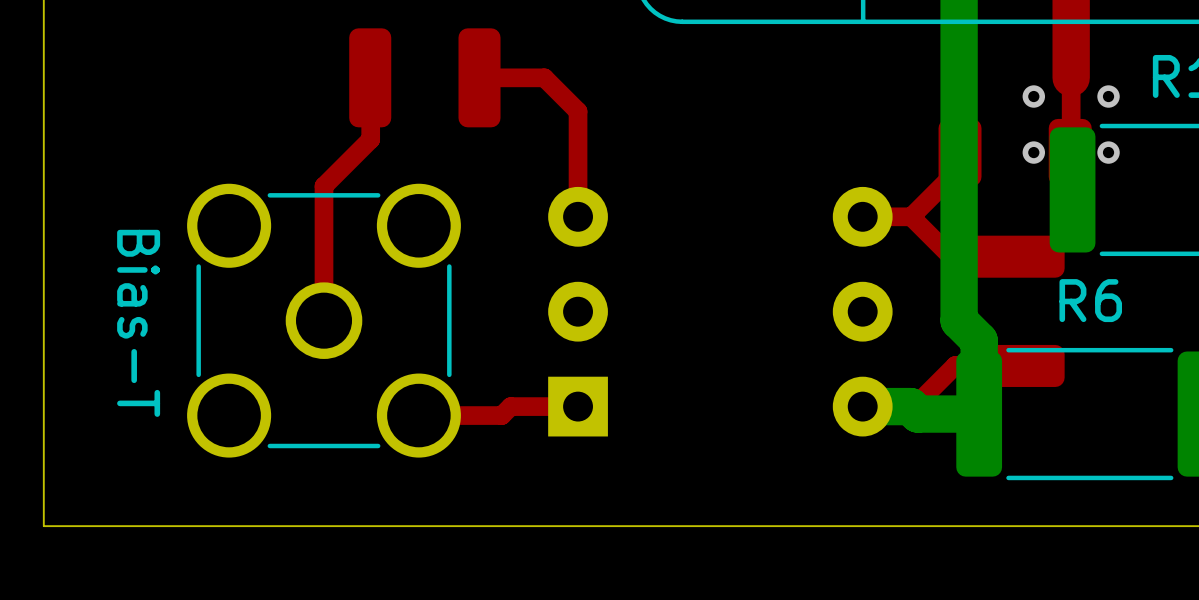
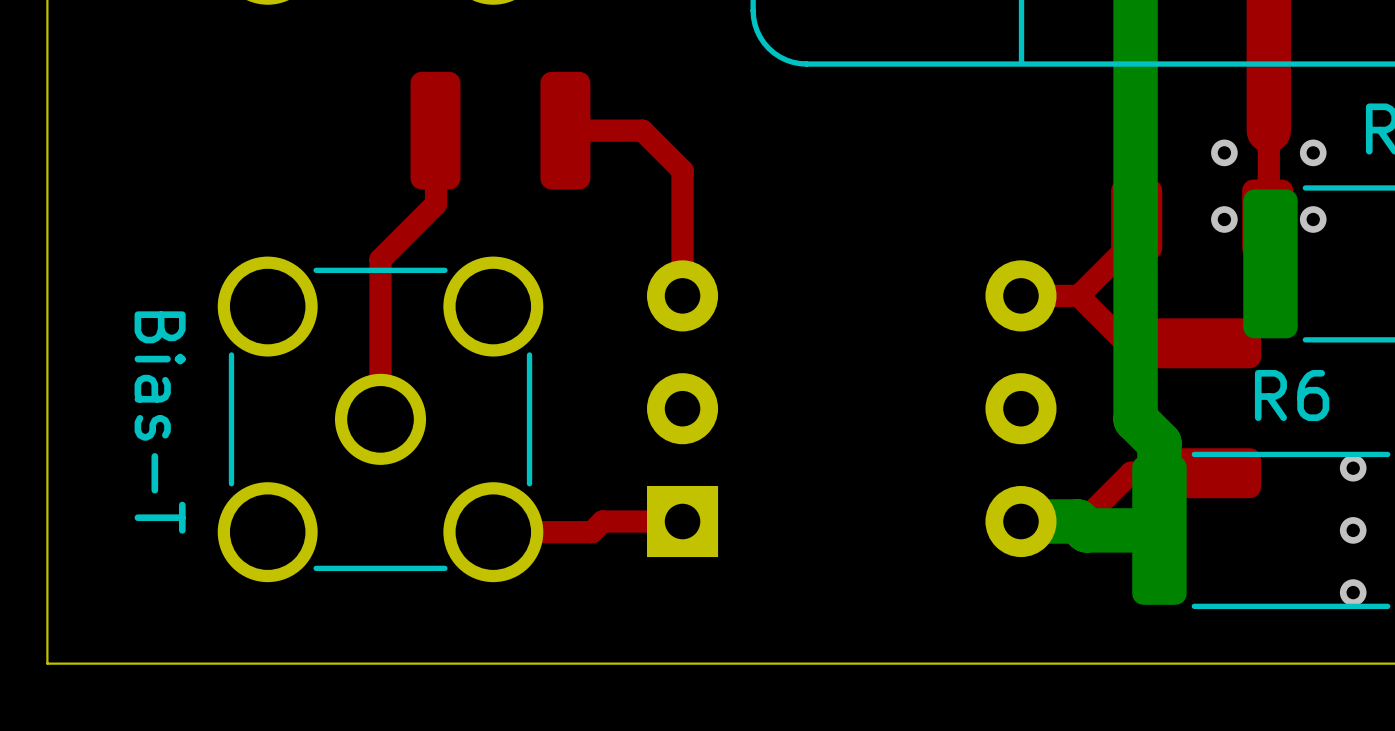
via: none -> (1353, 468)
via: none -> (1353, 530)
via: none -> (1353, 592)

